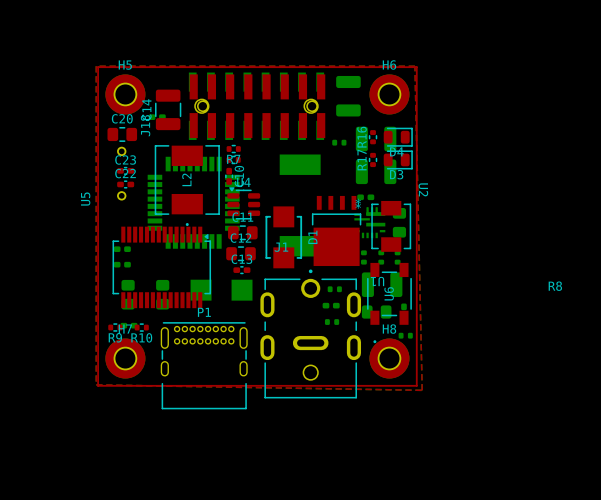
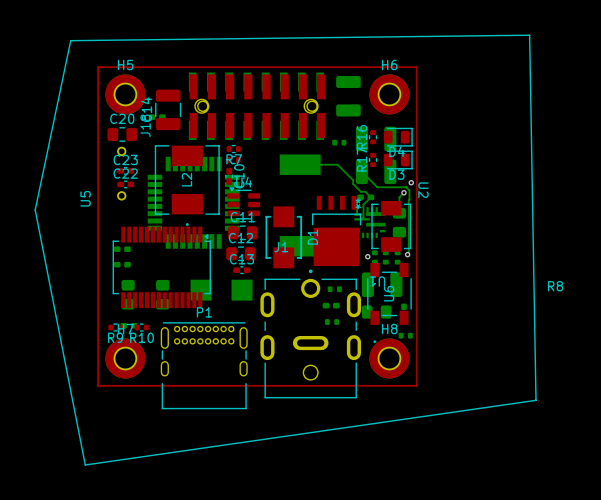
line: none -> (529, 35) (70, 40) (35, 210) (85, 464) (536, 400) (529, 35)
top zone outline: (96, 66) (414, 66) (422, 390) (96, 384) (96, 66) -> none
bottom track: none -> (300, 164) (337, 164) (353, 180) (353, 183) (360, 191) (365, 191) (370, 197) (363, 204) (362, 219)
bottom track: none -> (361, 171) (377, 187) (406, 187) (409, 190) (407, 254)
via: none -> (411, 182)
bottom track: none -> (403, 192) (399, 197) (399, 213)
via: none -> (403, 192)
bottom track: none -> (360, 197) (357, 200) (357, 214)
via: none -> (407, 254)
via: none -> (367, 256)
part: (363, 257) -> none
part: none -> (374, 257)
part: (381, 257) -> none
part: none -> (385, 257)

